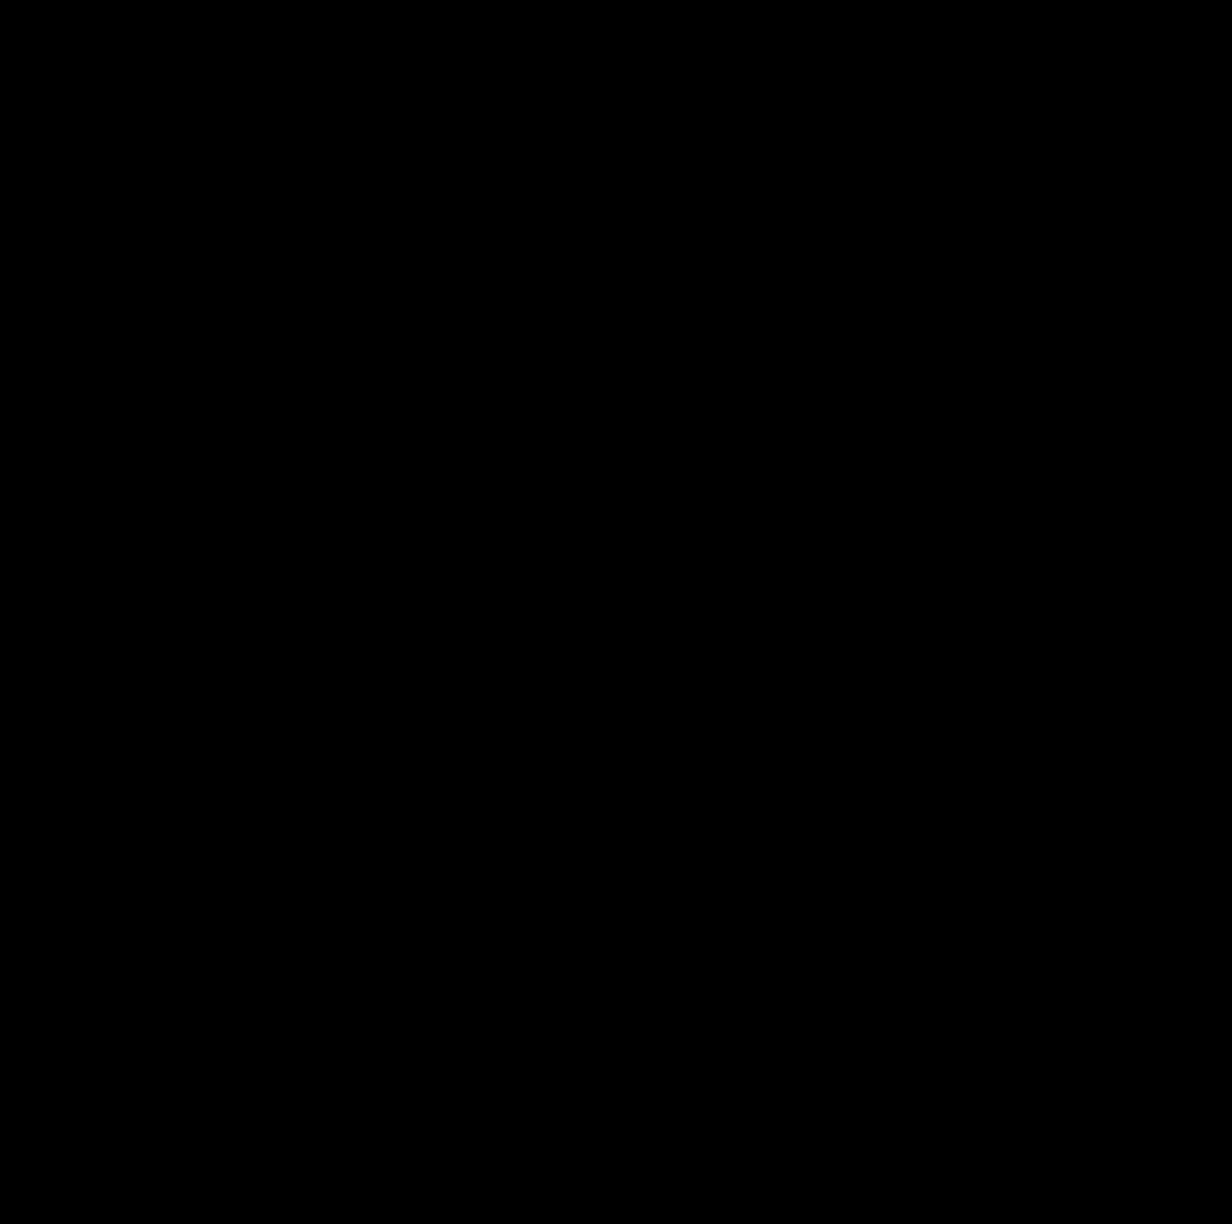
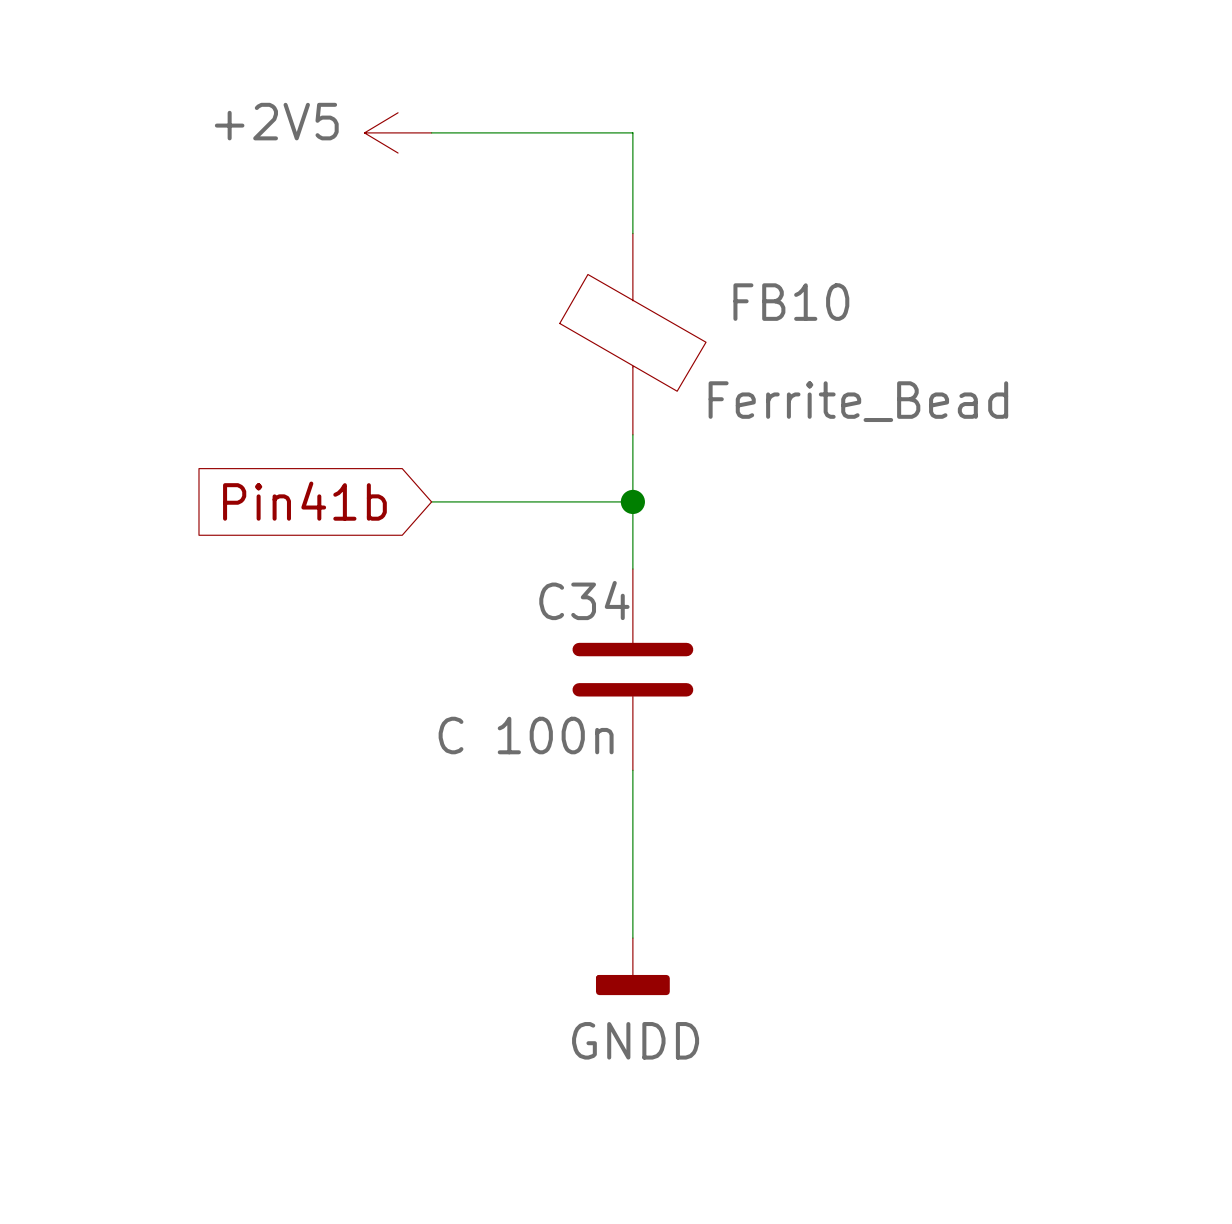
power symbol: none -> +2V5 (398, 132)
wire: none -> (431, 132) (632, 132) (632, 233)
FB10: none -> Ferrite_Bead (632, 334)
wire: none -> (632, 434) (632, 569)
global label: none -> Pin41b (304, 501)
wire: none -> (431, 501) (632, 501)
junction: none -> (632, 501)
C34: none -> C 100n (632, 669)
wire: none -> (632, 770) (632, 938)
power symbol: none -> GNDD (632, 966)

